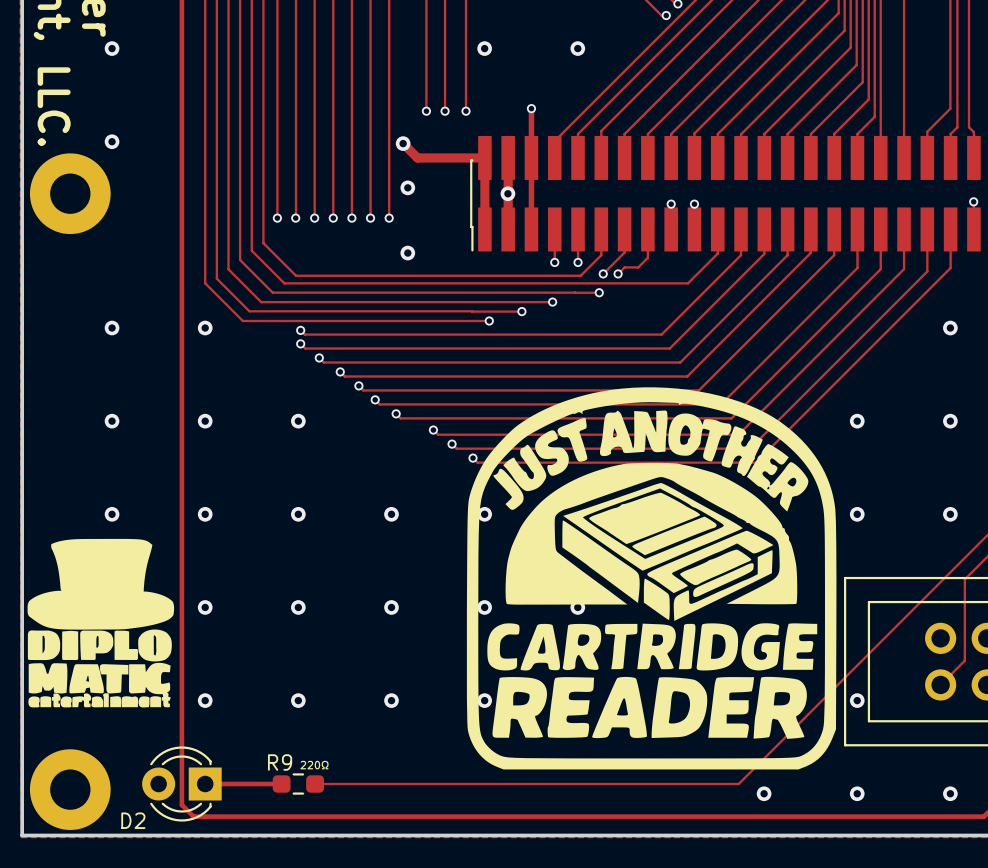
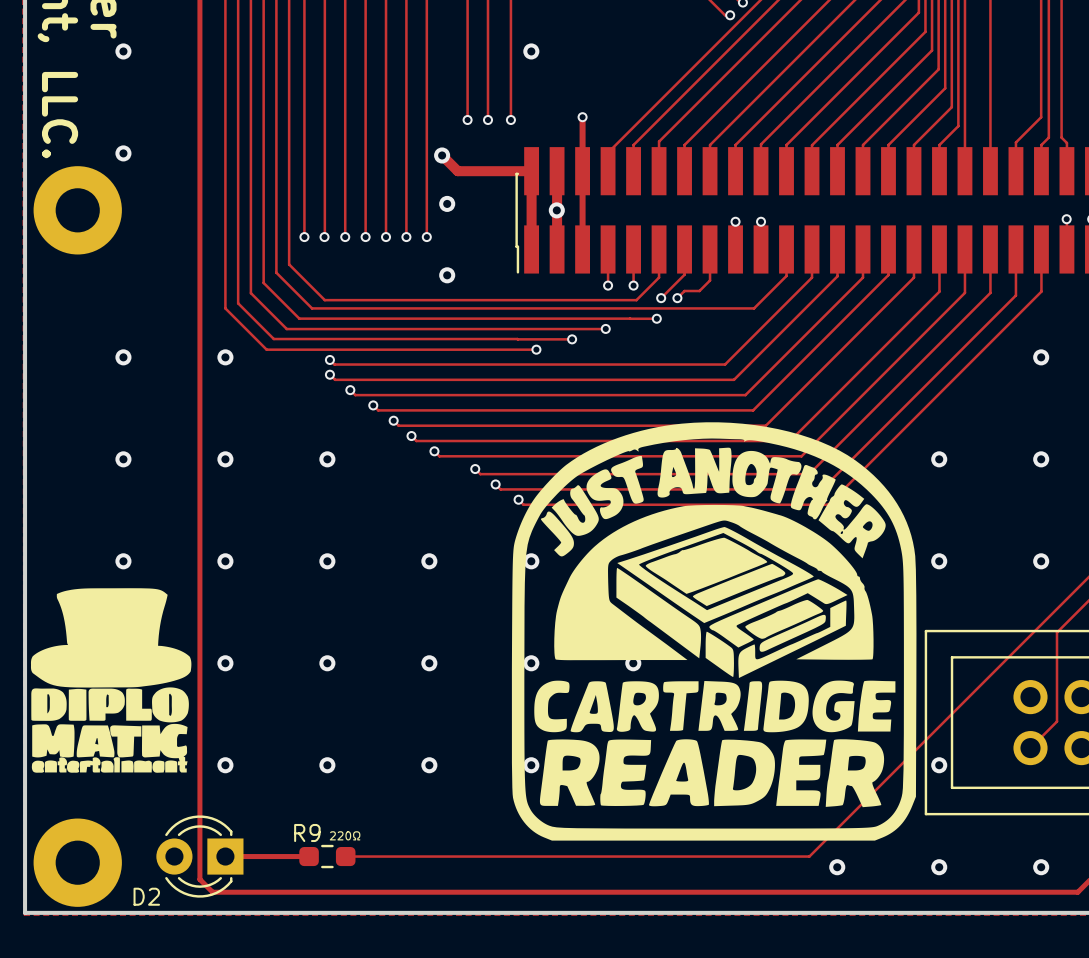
via: (577, 48) -> none

